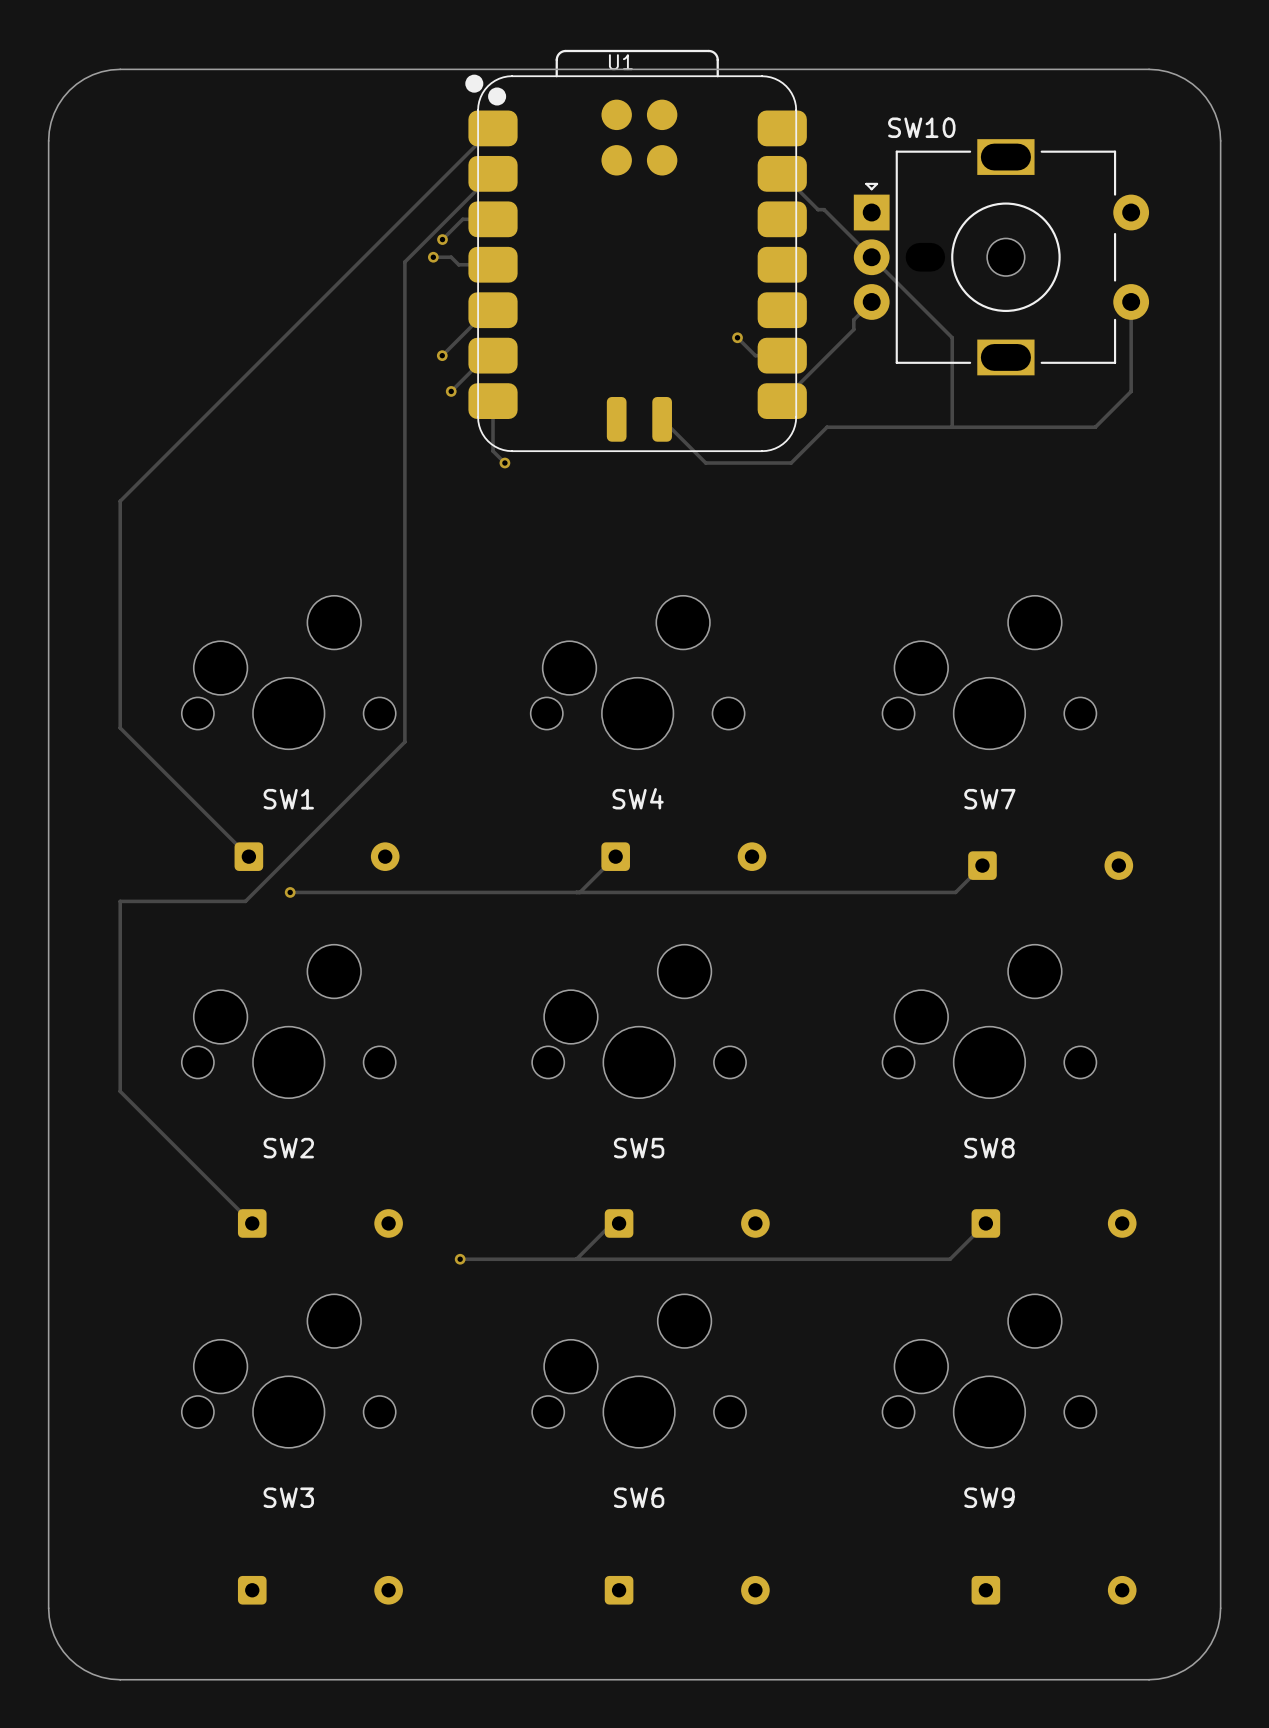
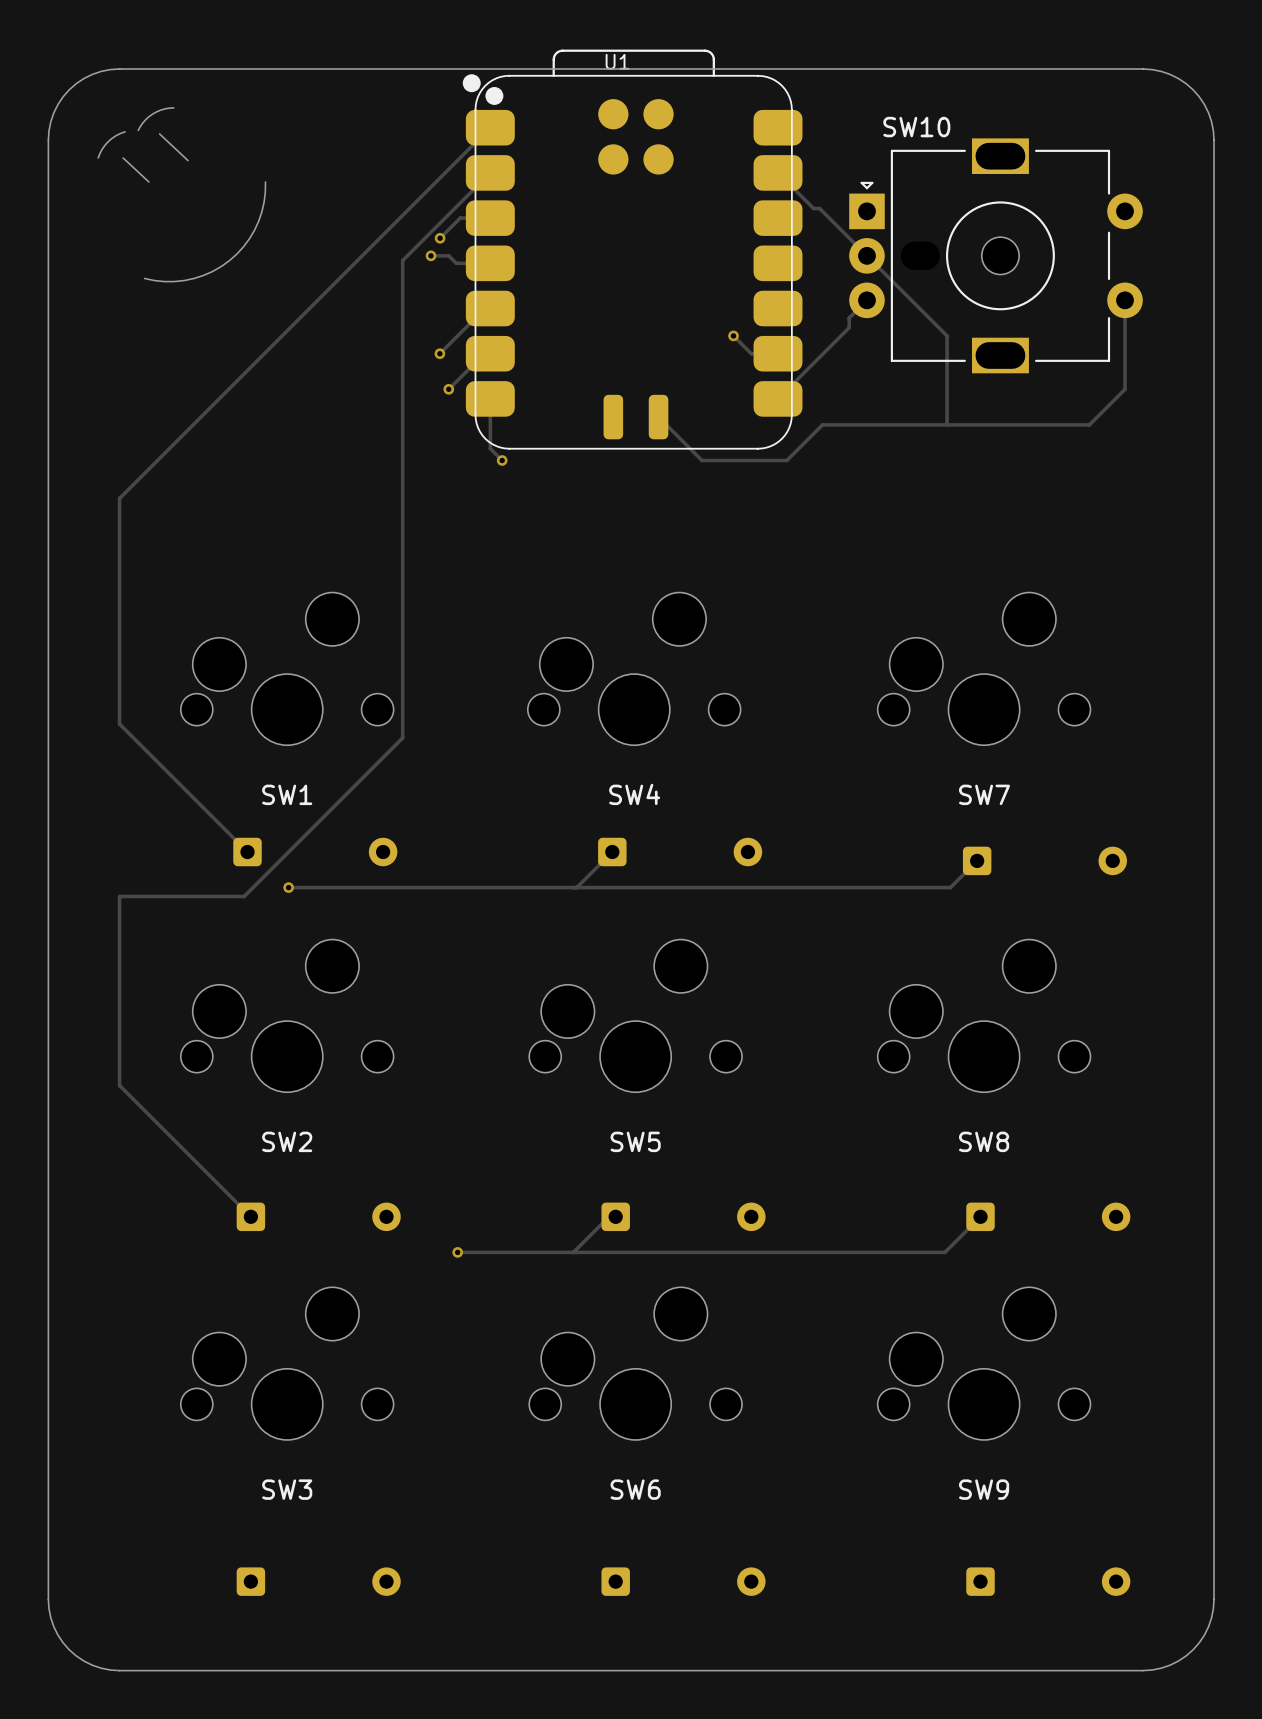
board edge: none -> (173, 107) (152, 113) (138, 130)
board edge: none -> (125, 131) (108, 141) (98, 157)
board edge: none -> (159, 133) (188, 160)
board edge: none -> (123, 157) (148, 181)
board edge: none -> (265, 181) (264, 201) (258, 221) (249, 238) (229, 260) (212, 271) (184, 280) (164, 281) (144, 278)

